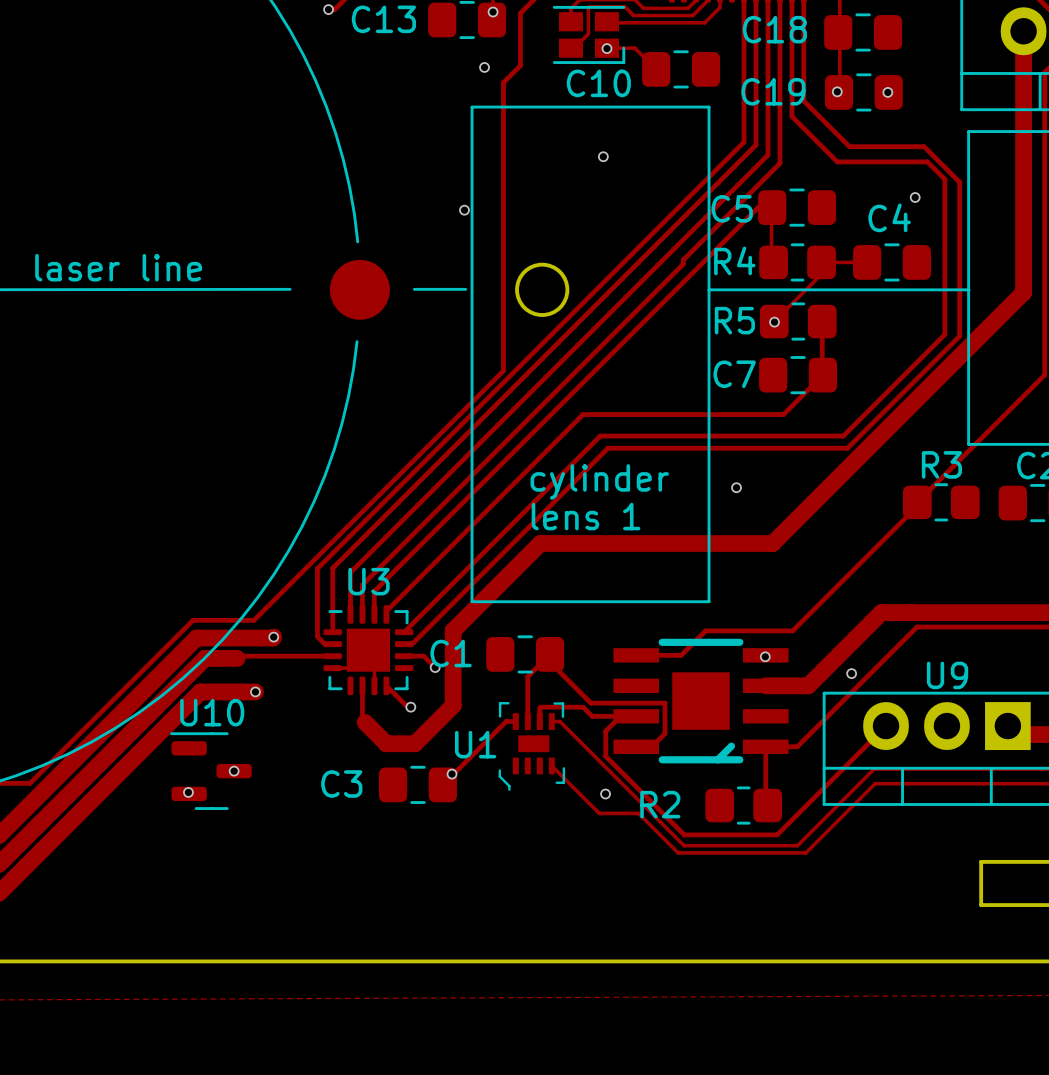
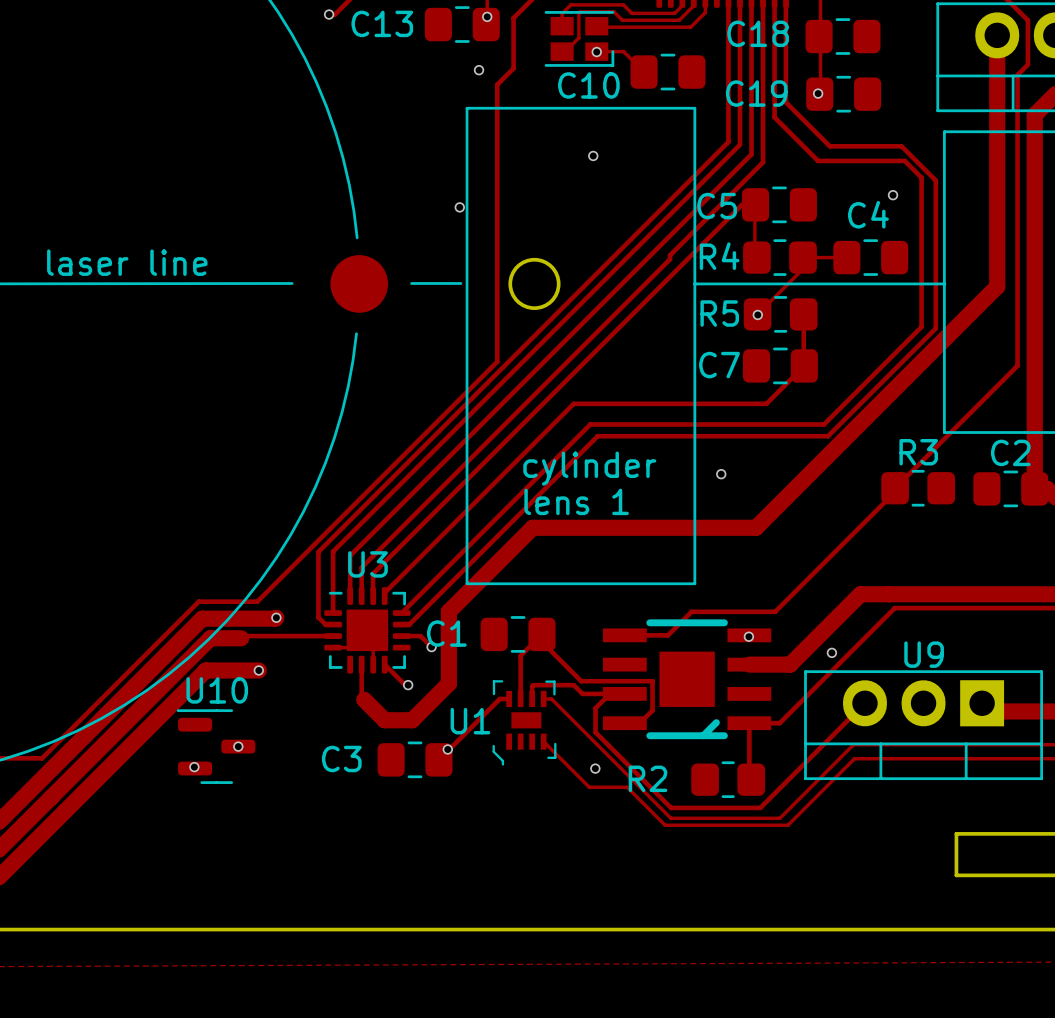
via: (887, 92) -> none

